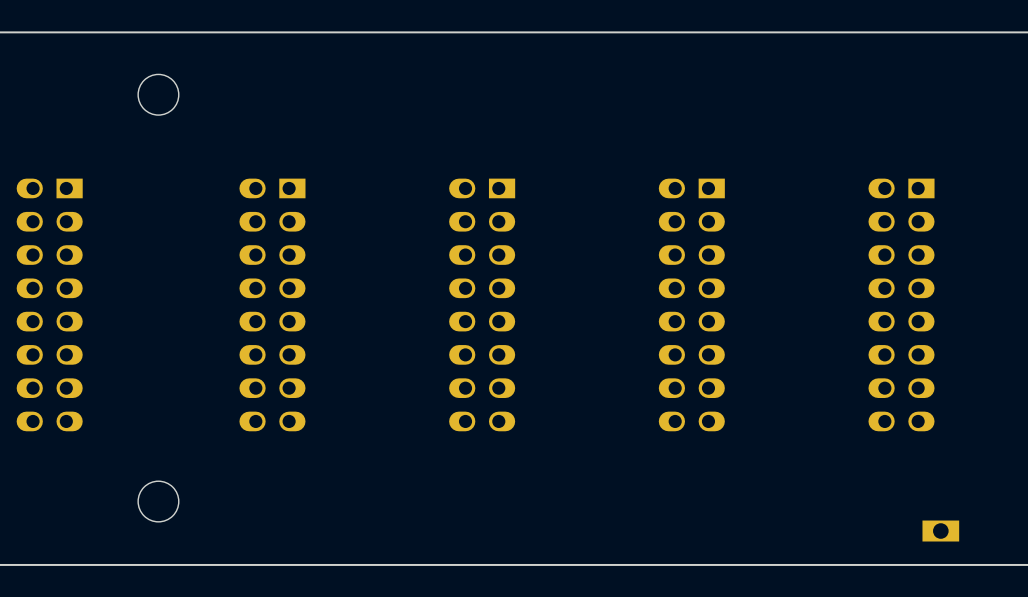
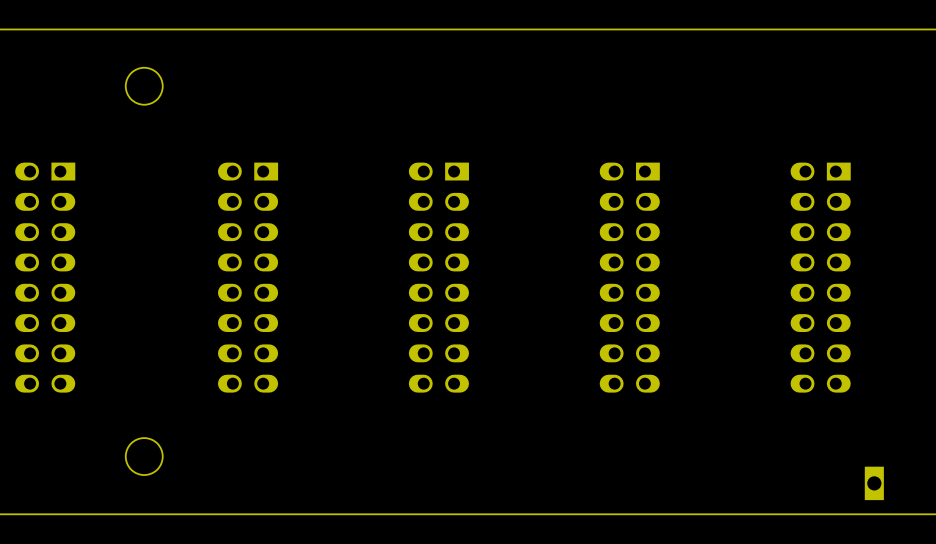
part rotation: 0° (940, 531) -> 90° clockwise (874, 483)

